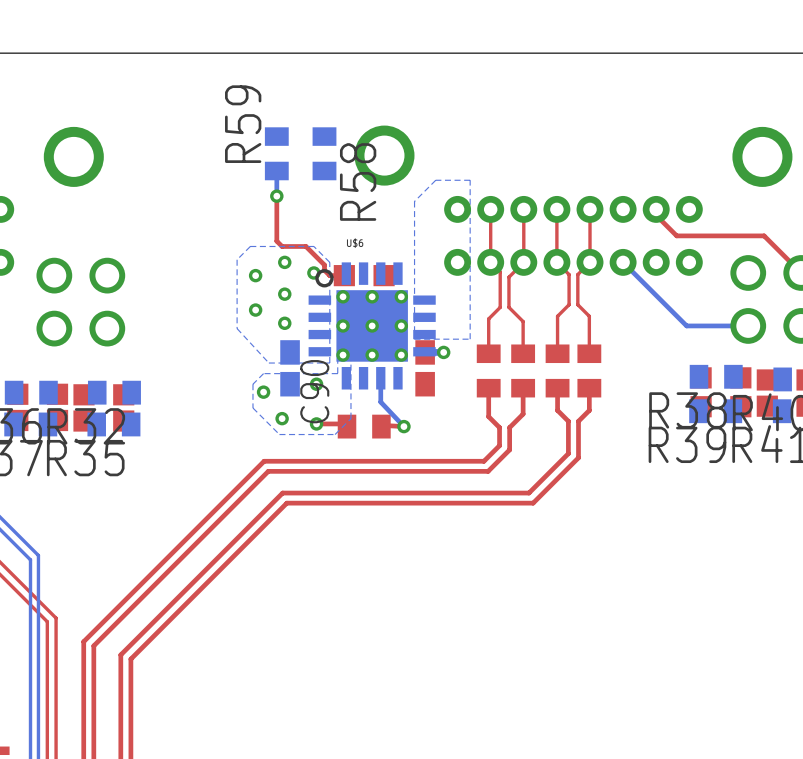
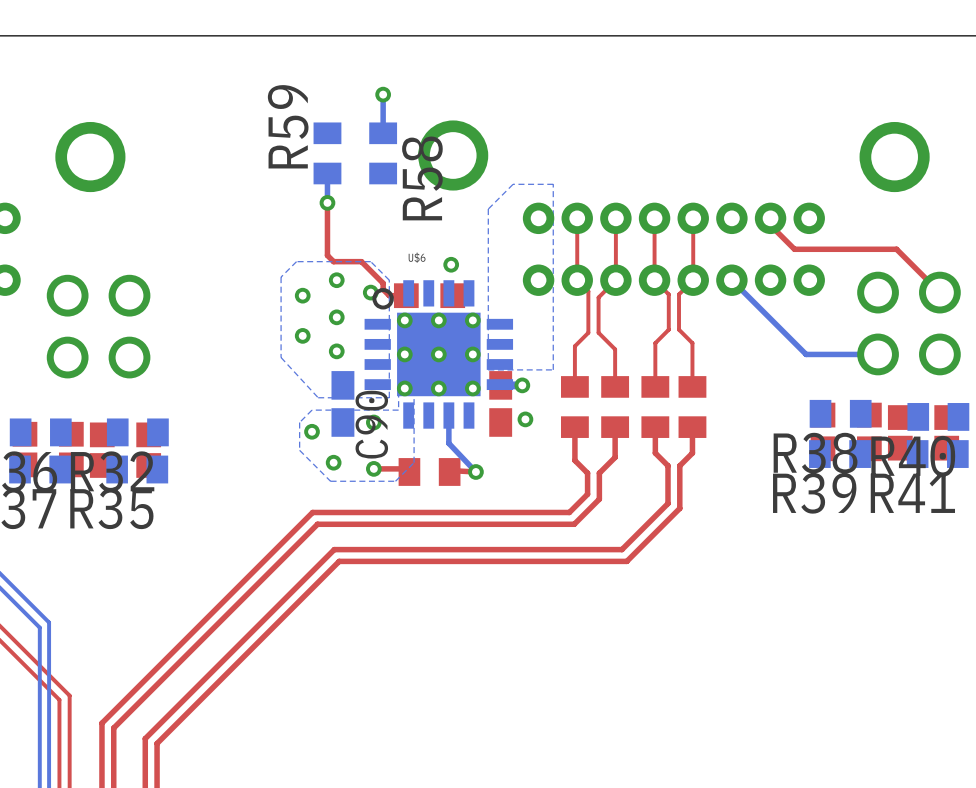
bottom track: none -> (383, 94) (383, 133)
via: none -> (383, 94)
via: none -> (451, 264)
via: none -> (525, 419)

